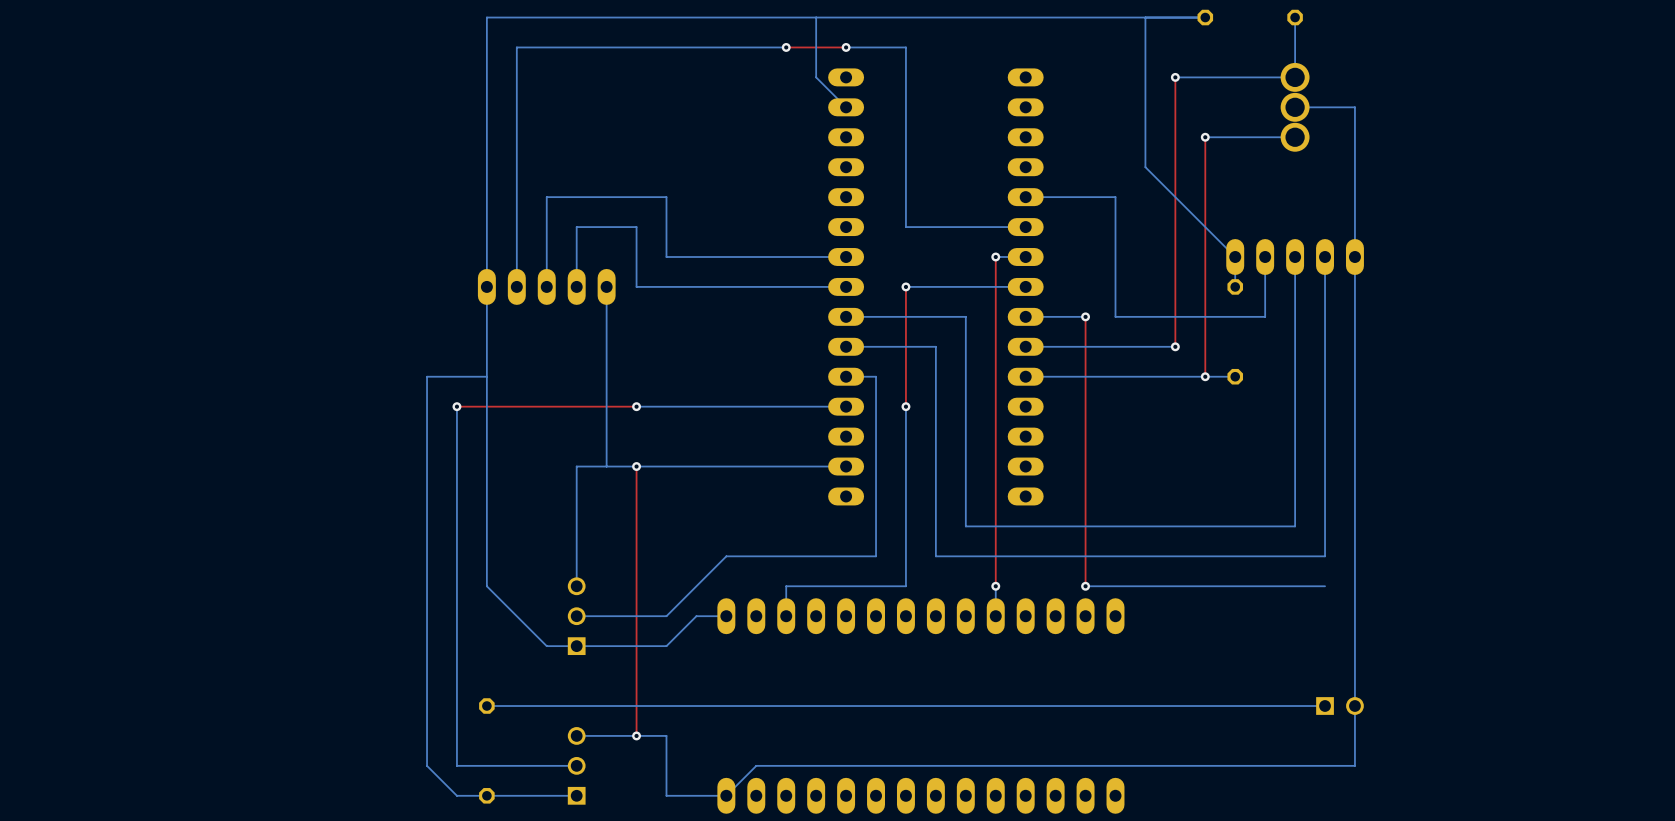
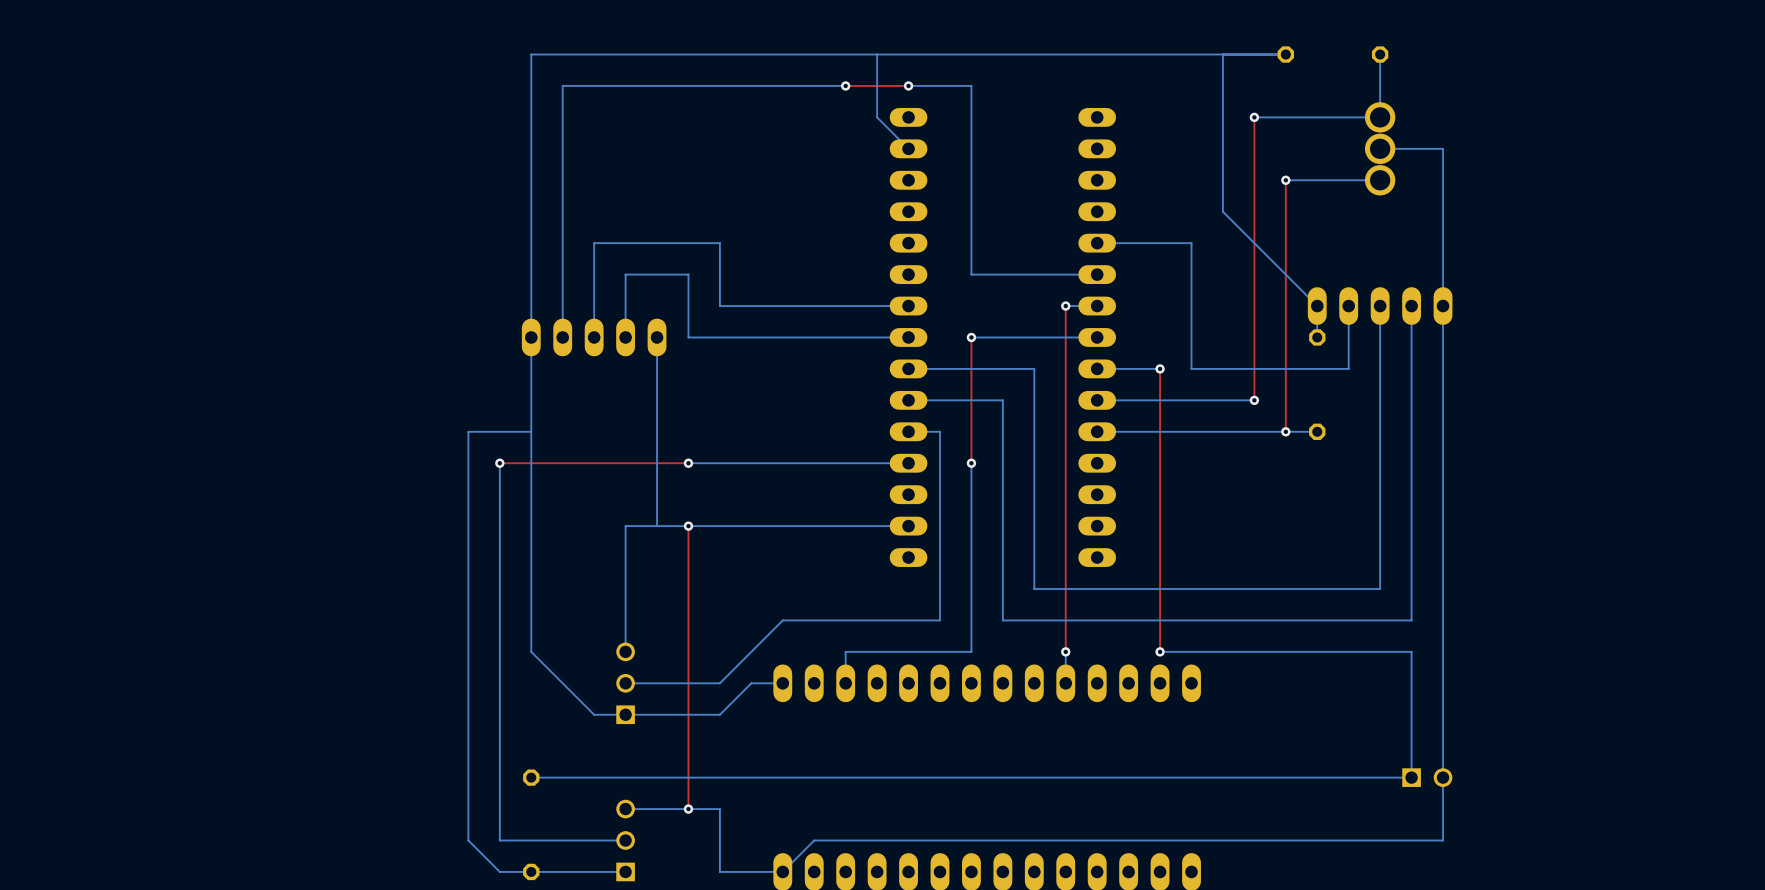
bottom track: none -> (1411, 651) (1411, 777)

